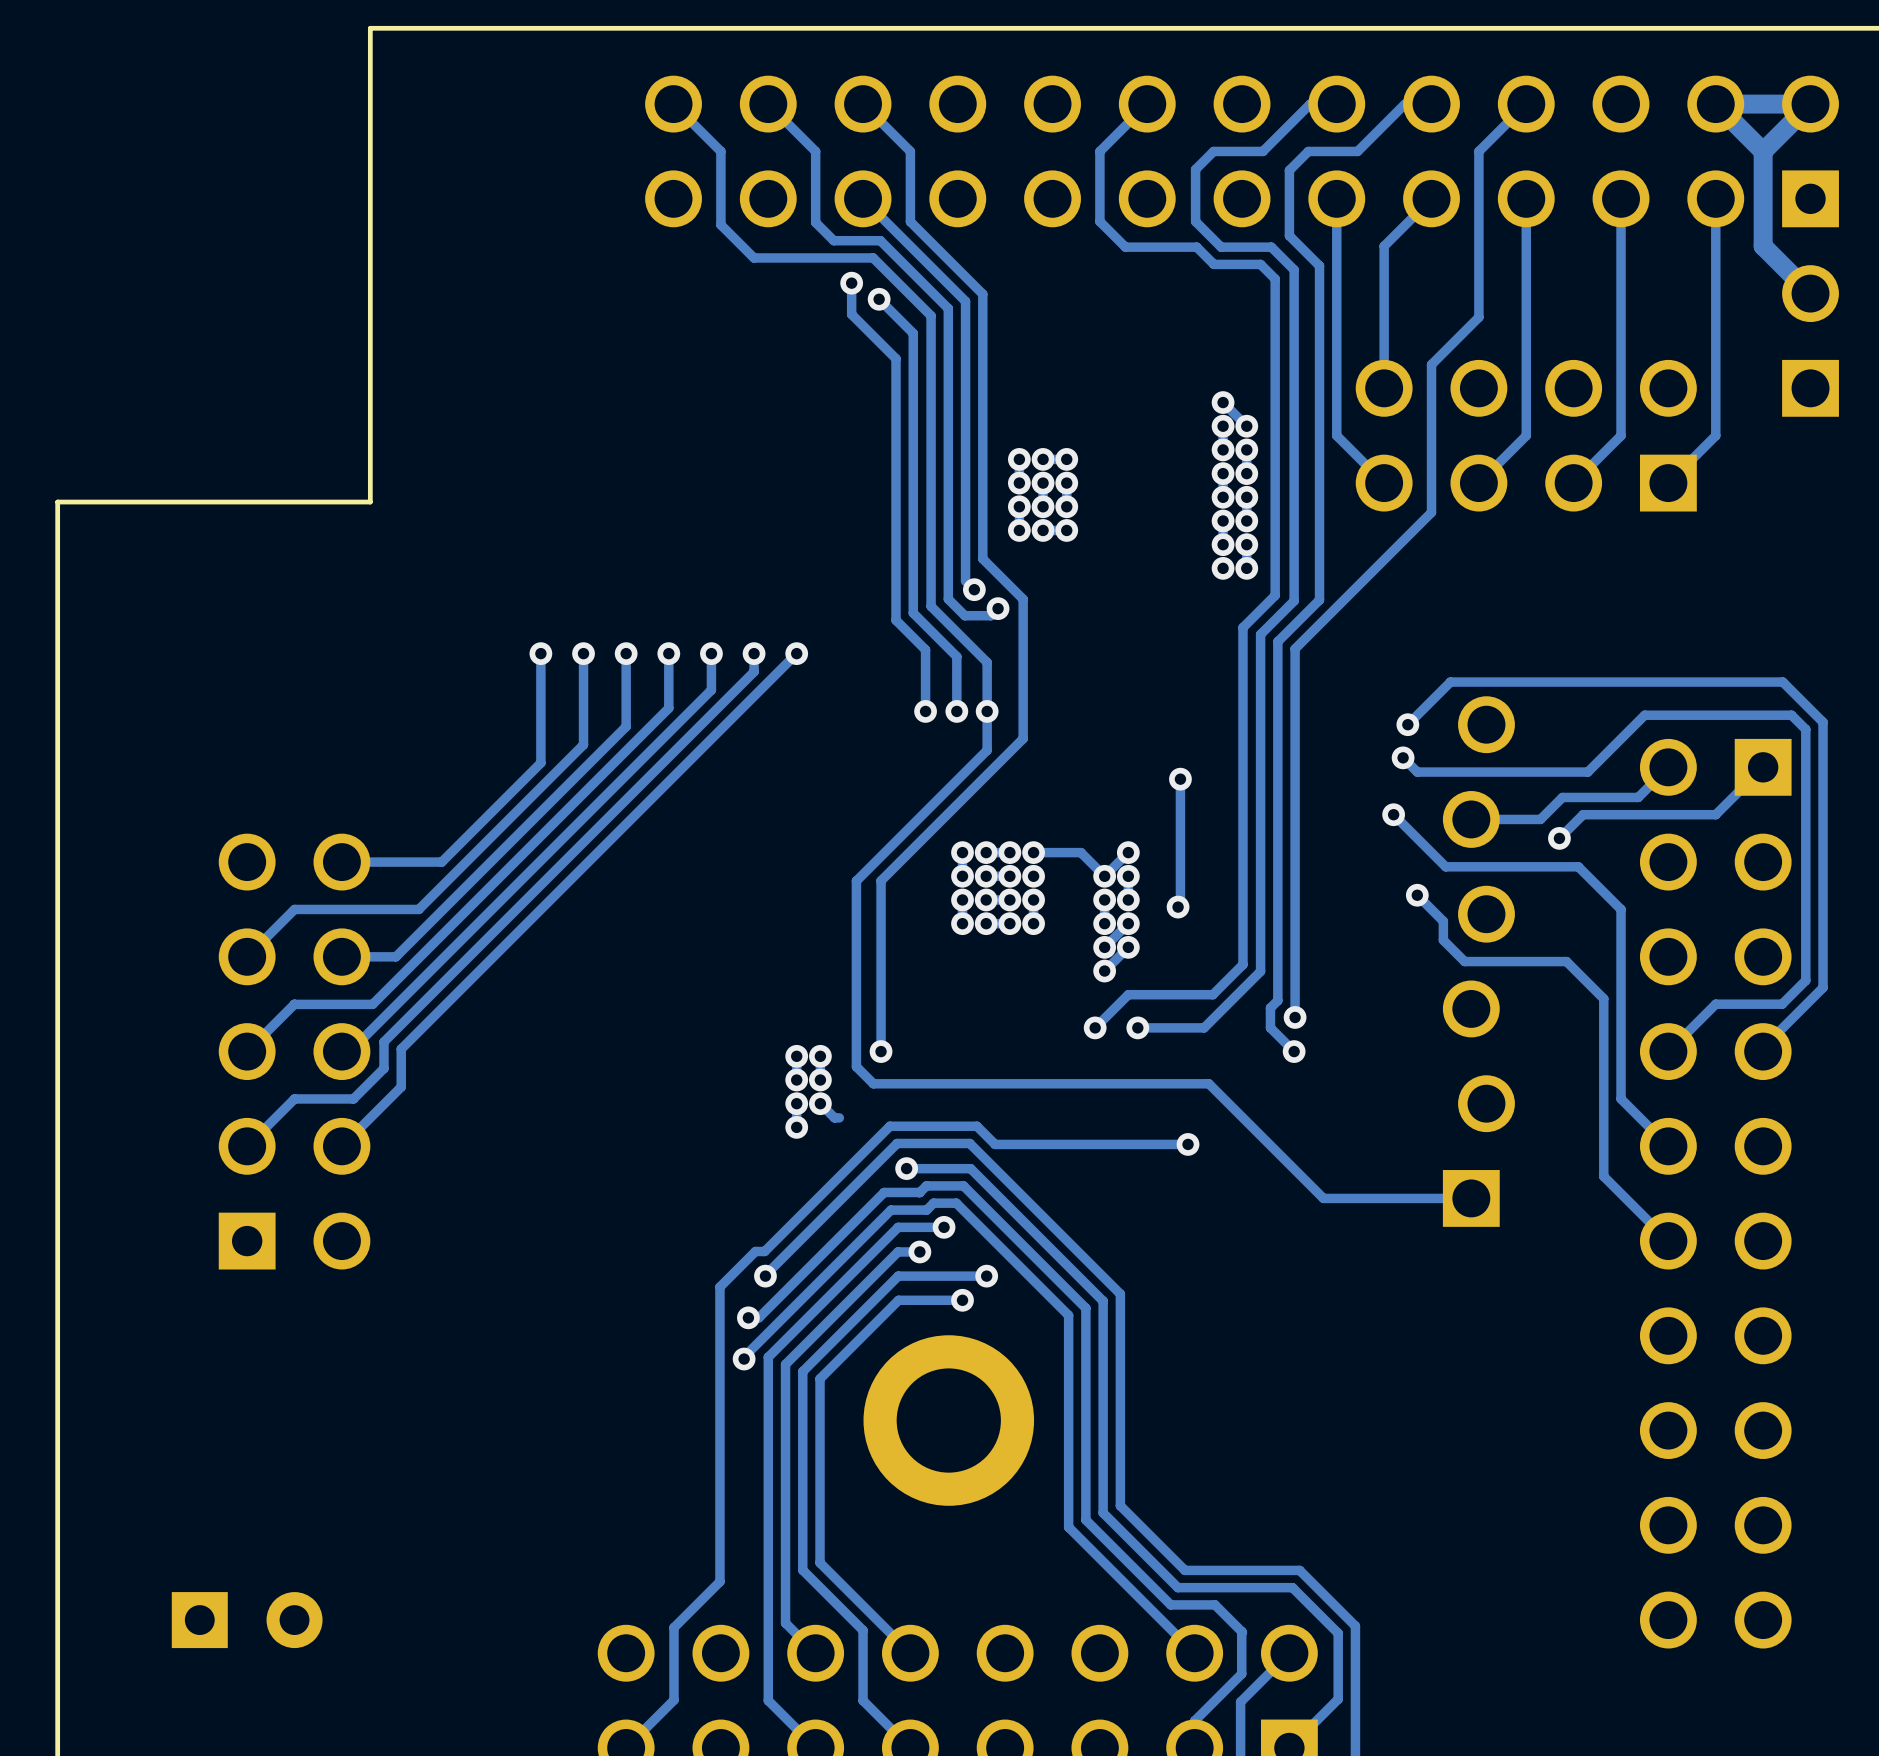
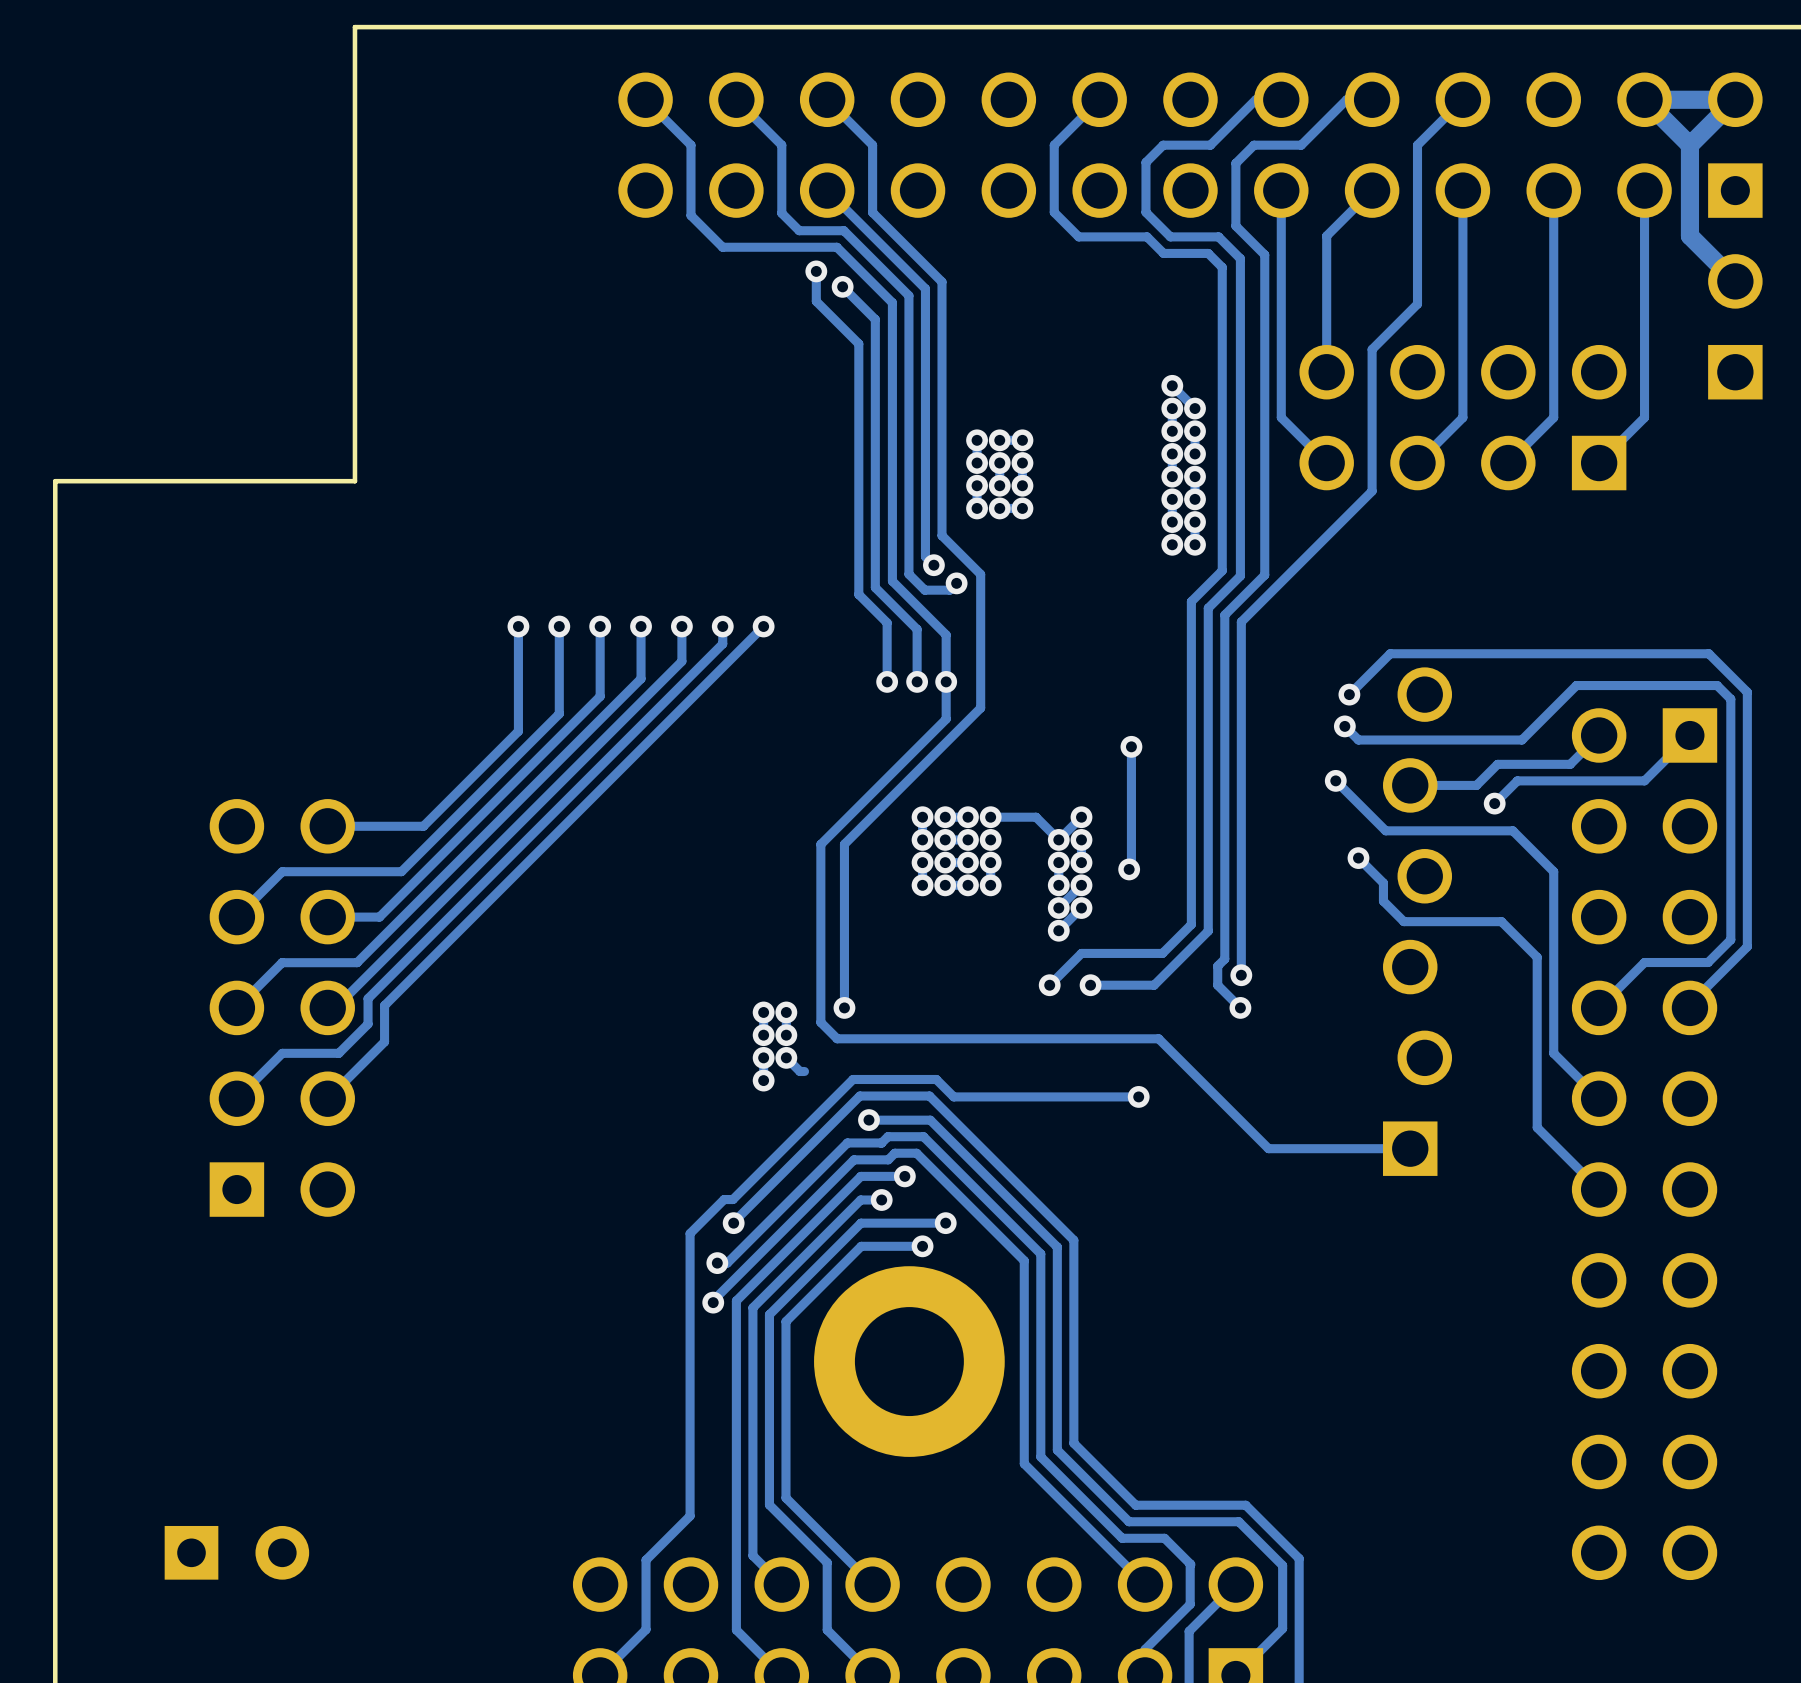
part footprint: [863, 1335, 1035, 1506] -> [814, 1266, 1005, 1457]

